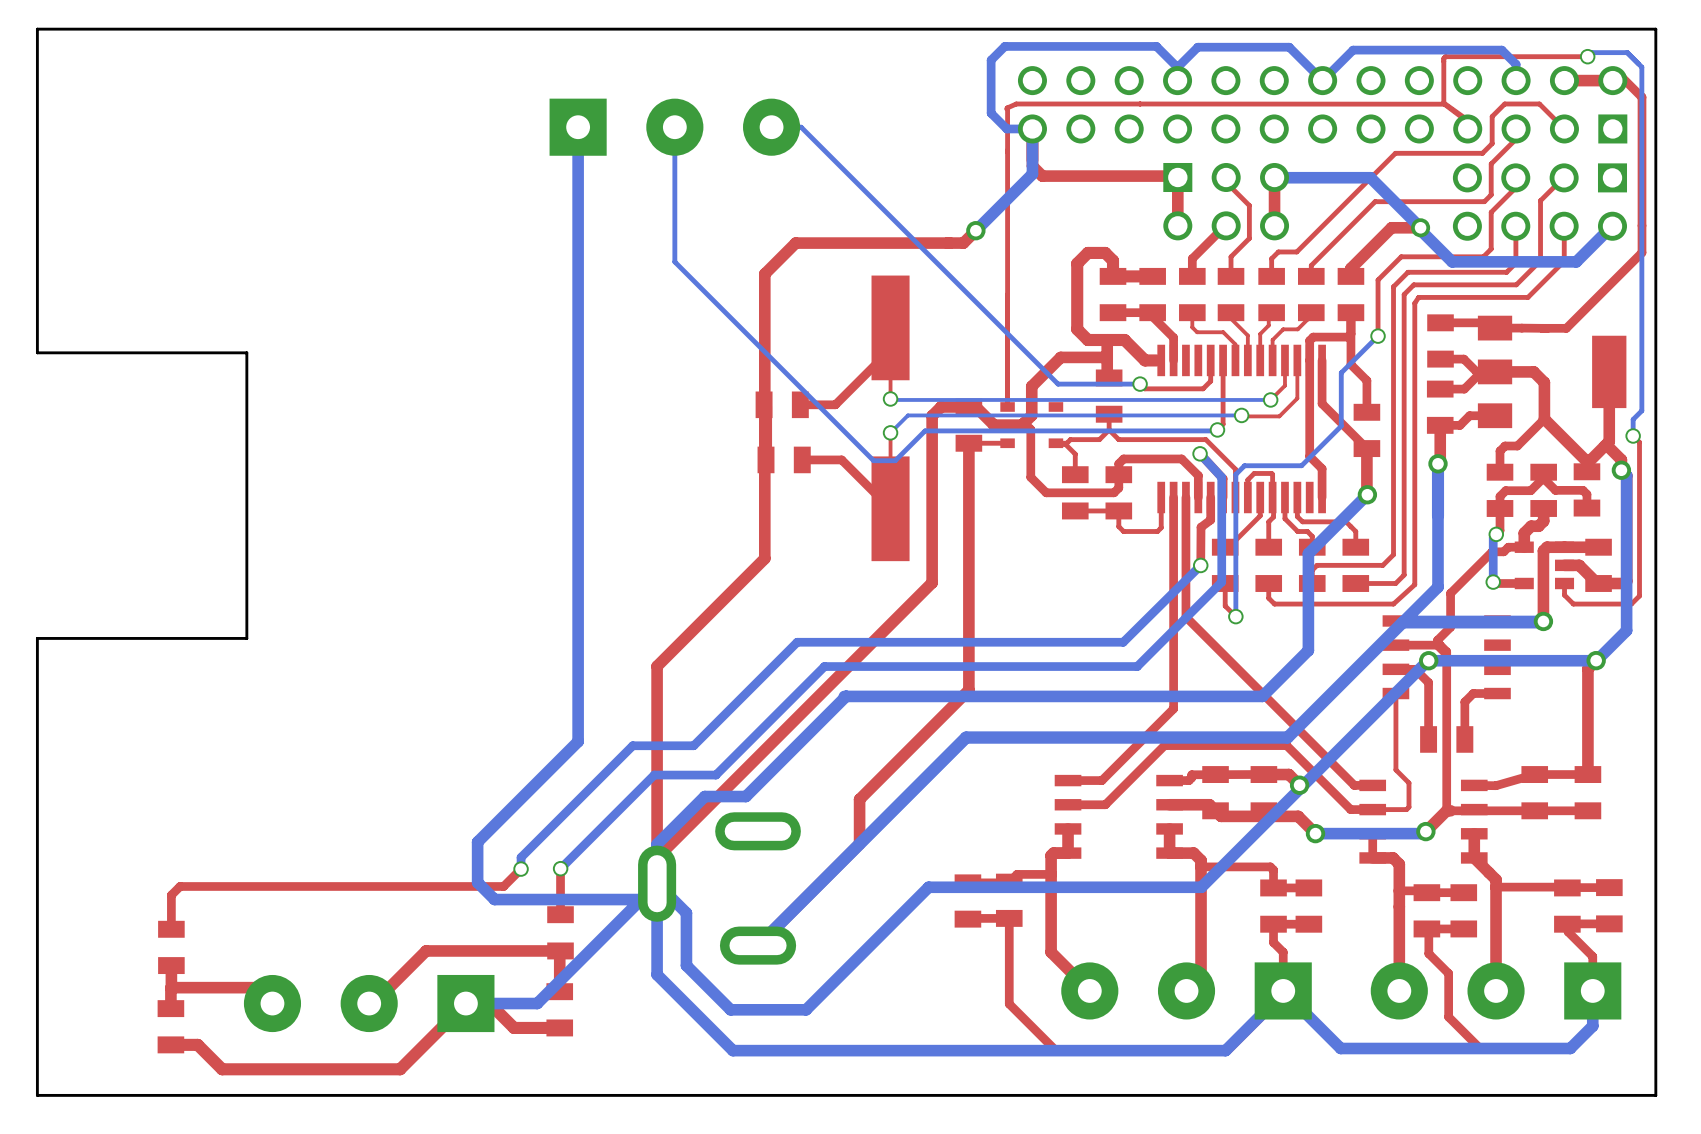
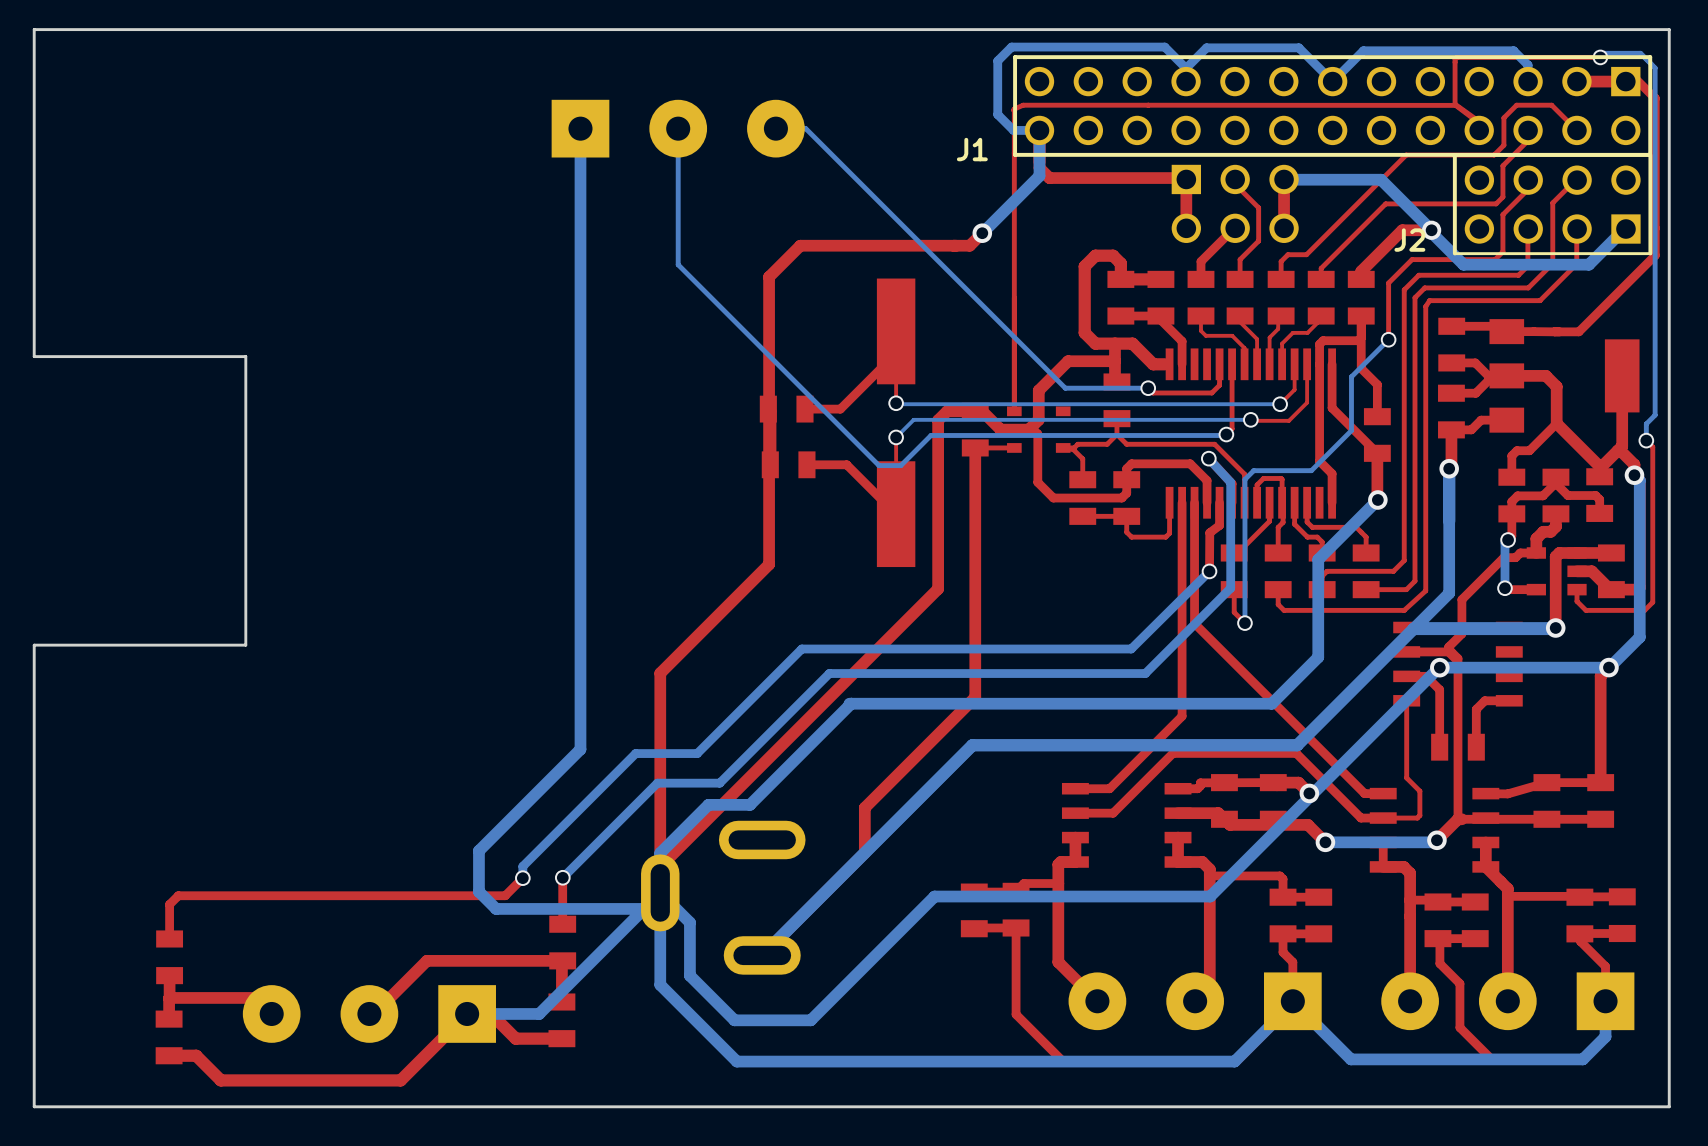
J1 side: top (1322, 104) -> bottom (1332, 106)
J2 side: top (1539, 202) -> bottom (1552, 204)

